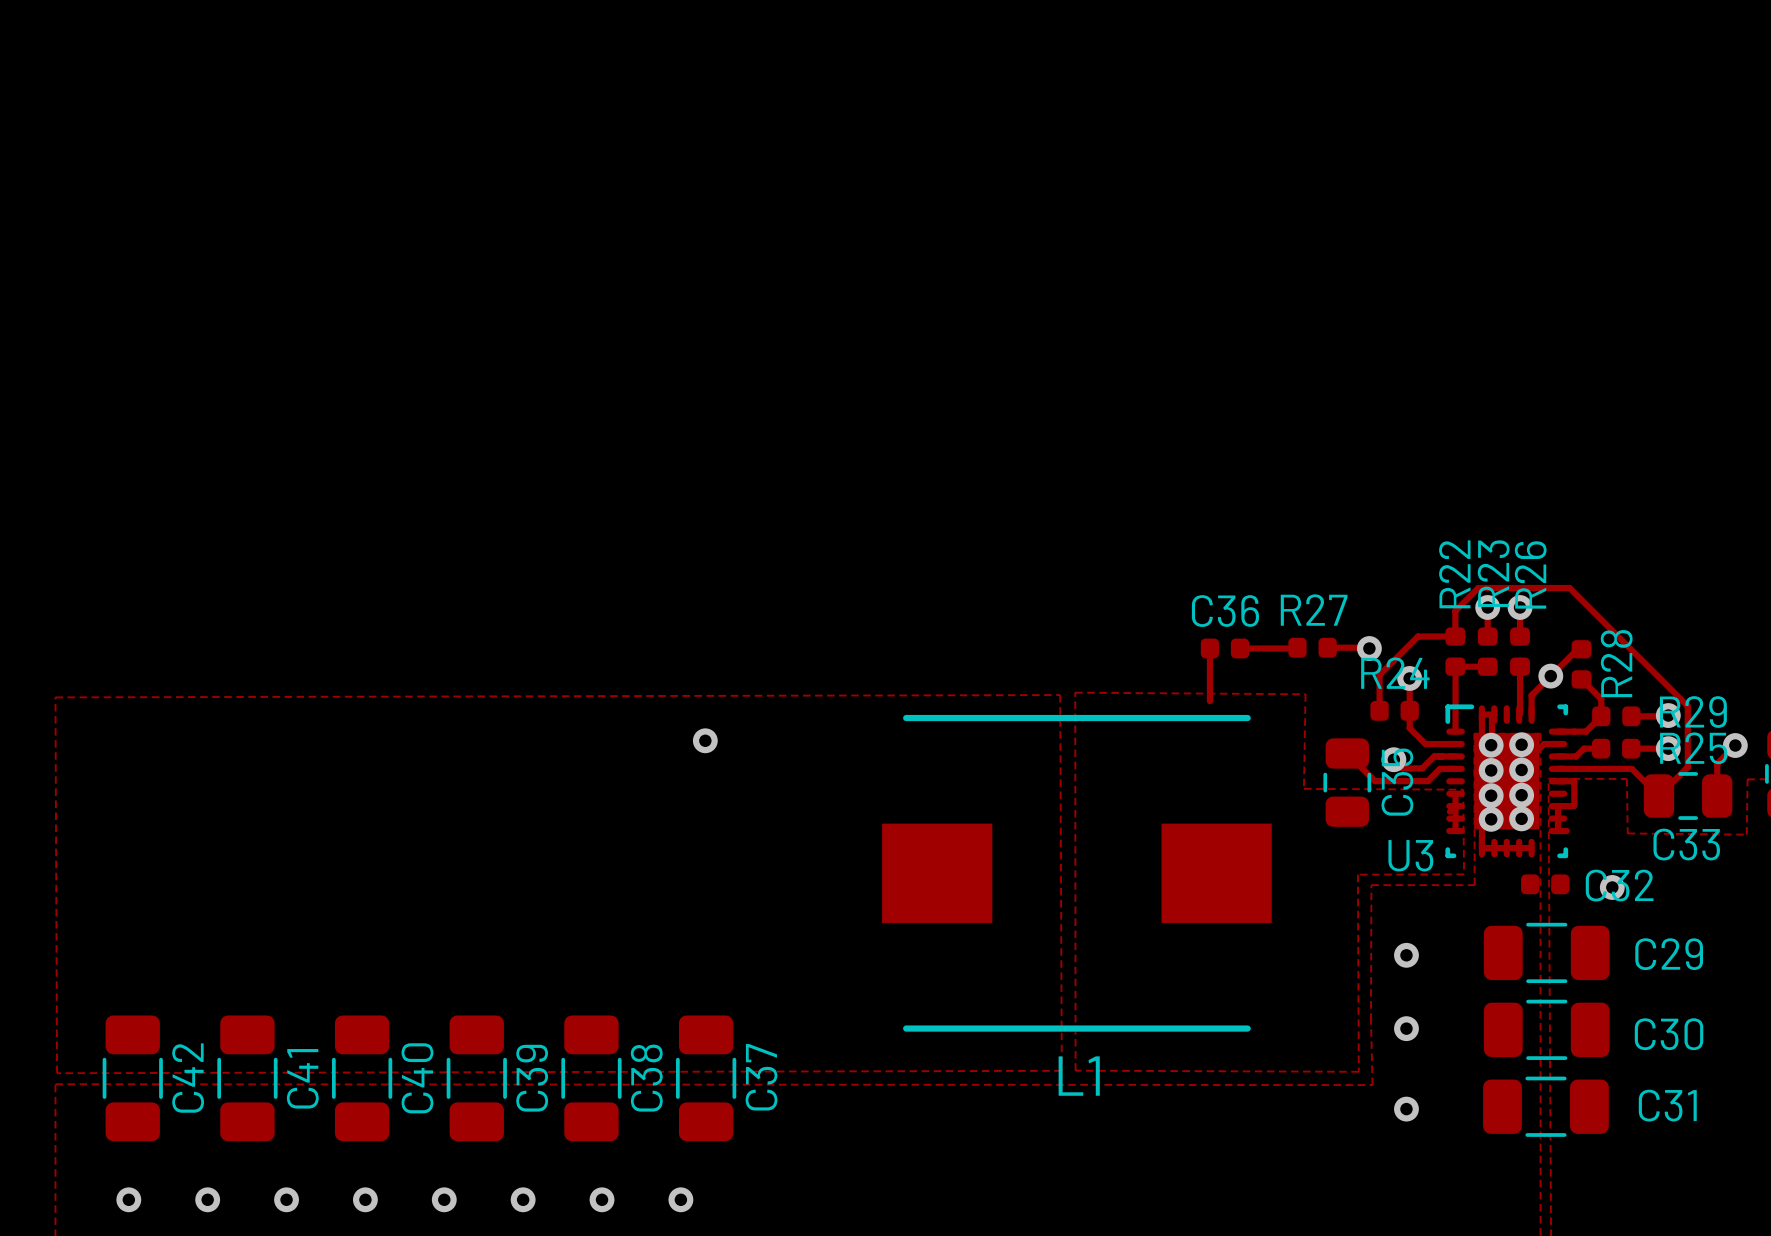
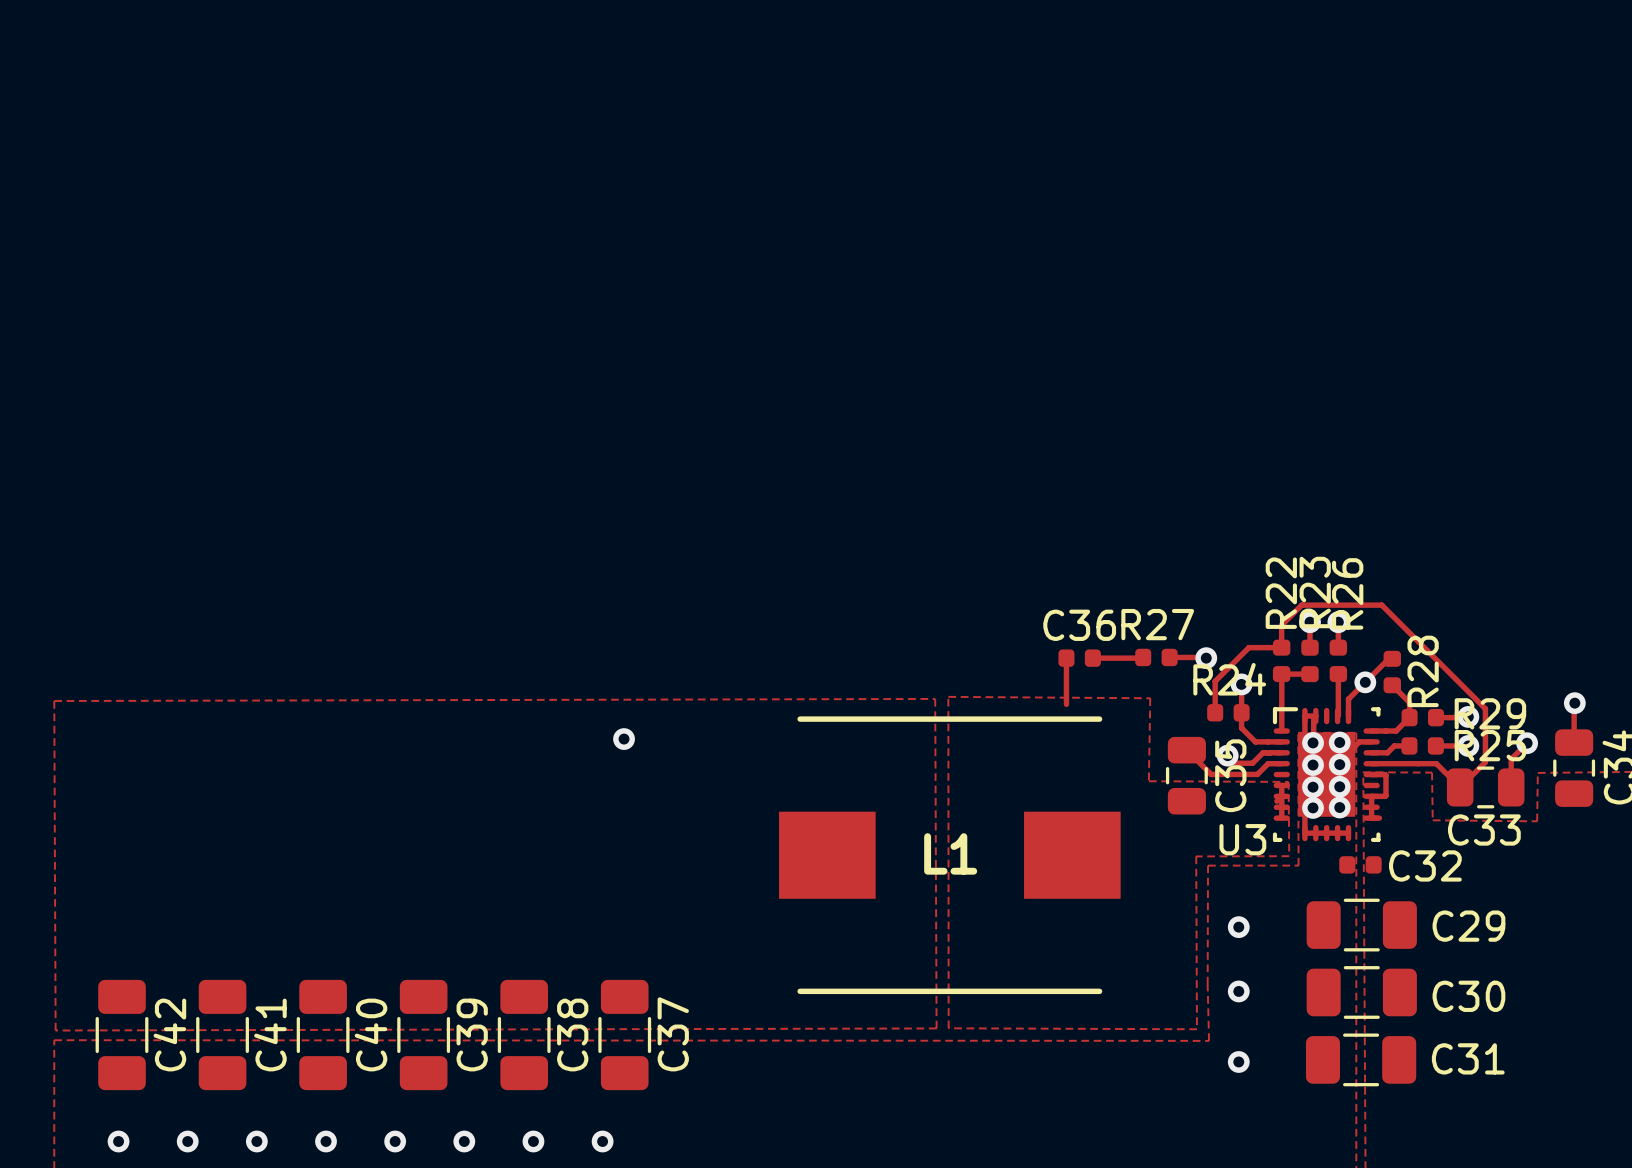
via: (1612, 887) -> none
L1 name position: L1 (1079, 1076) -> L1 (950, 853)

